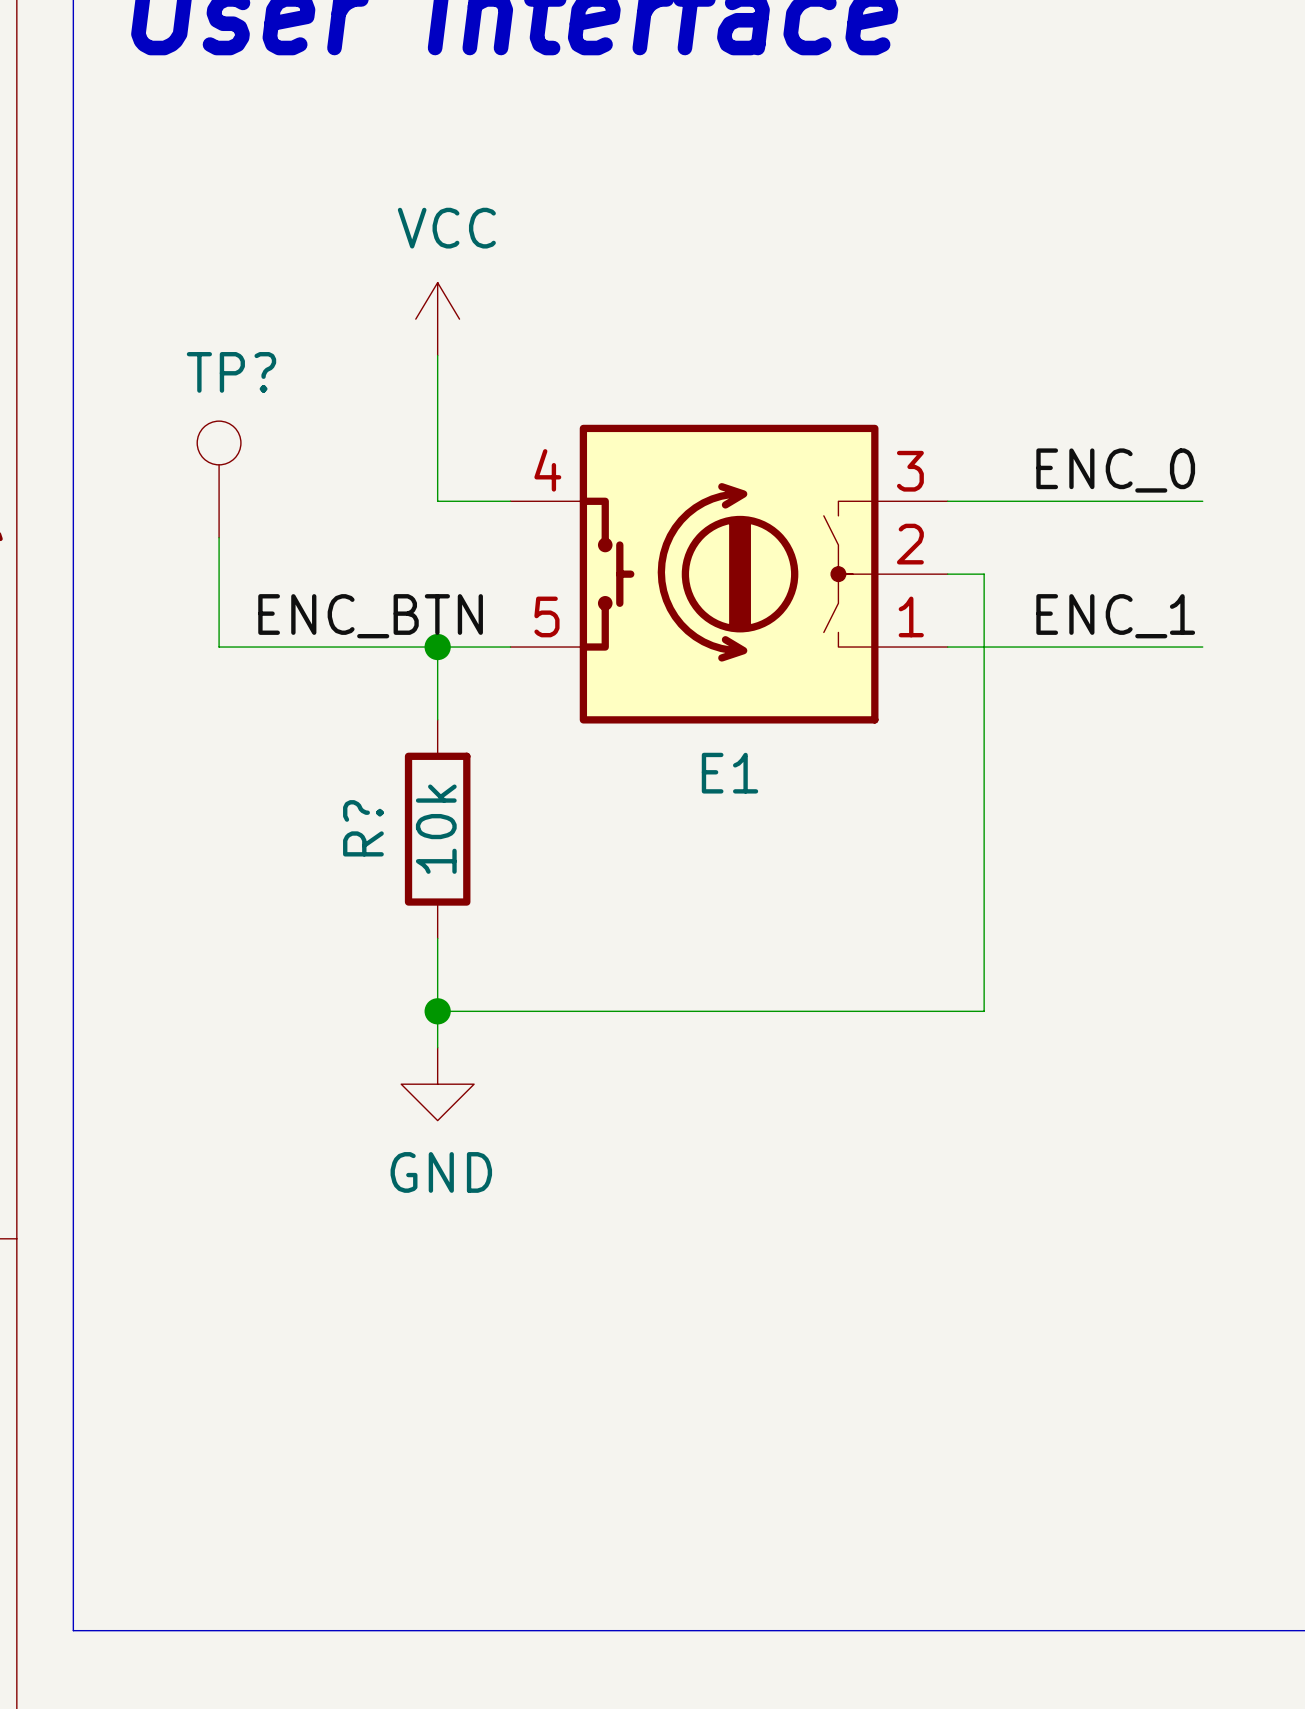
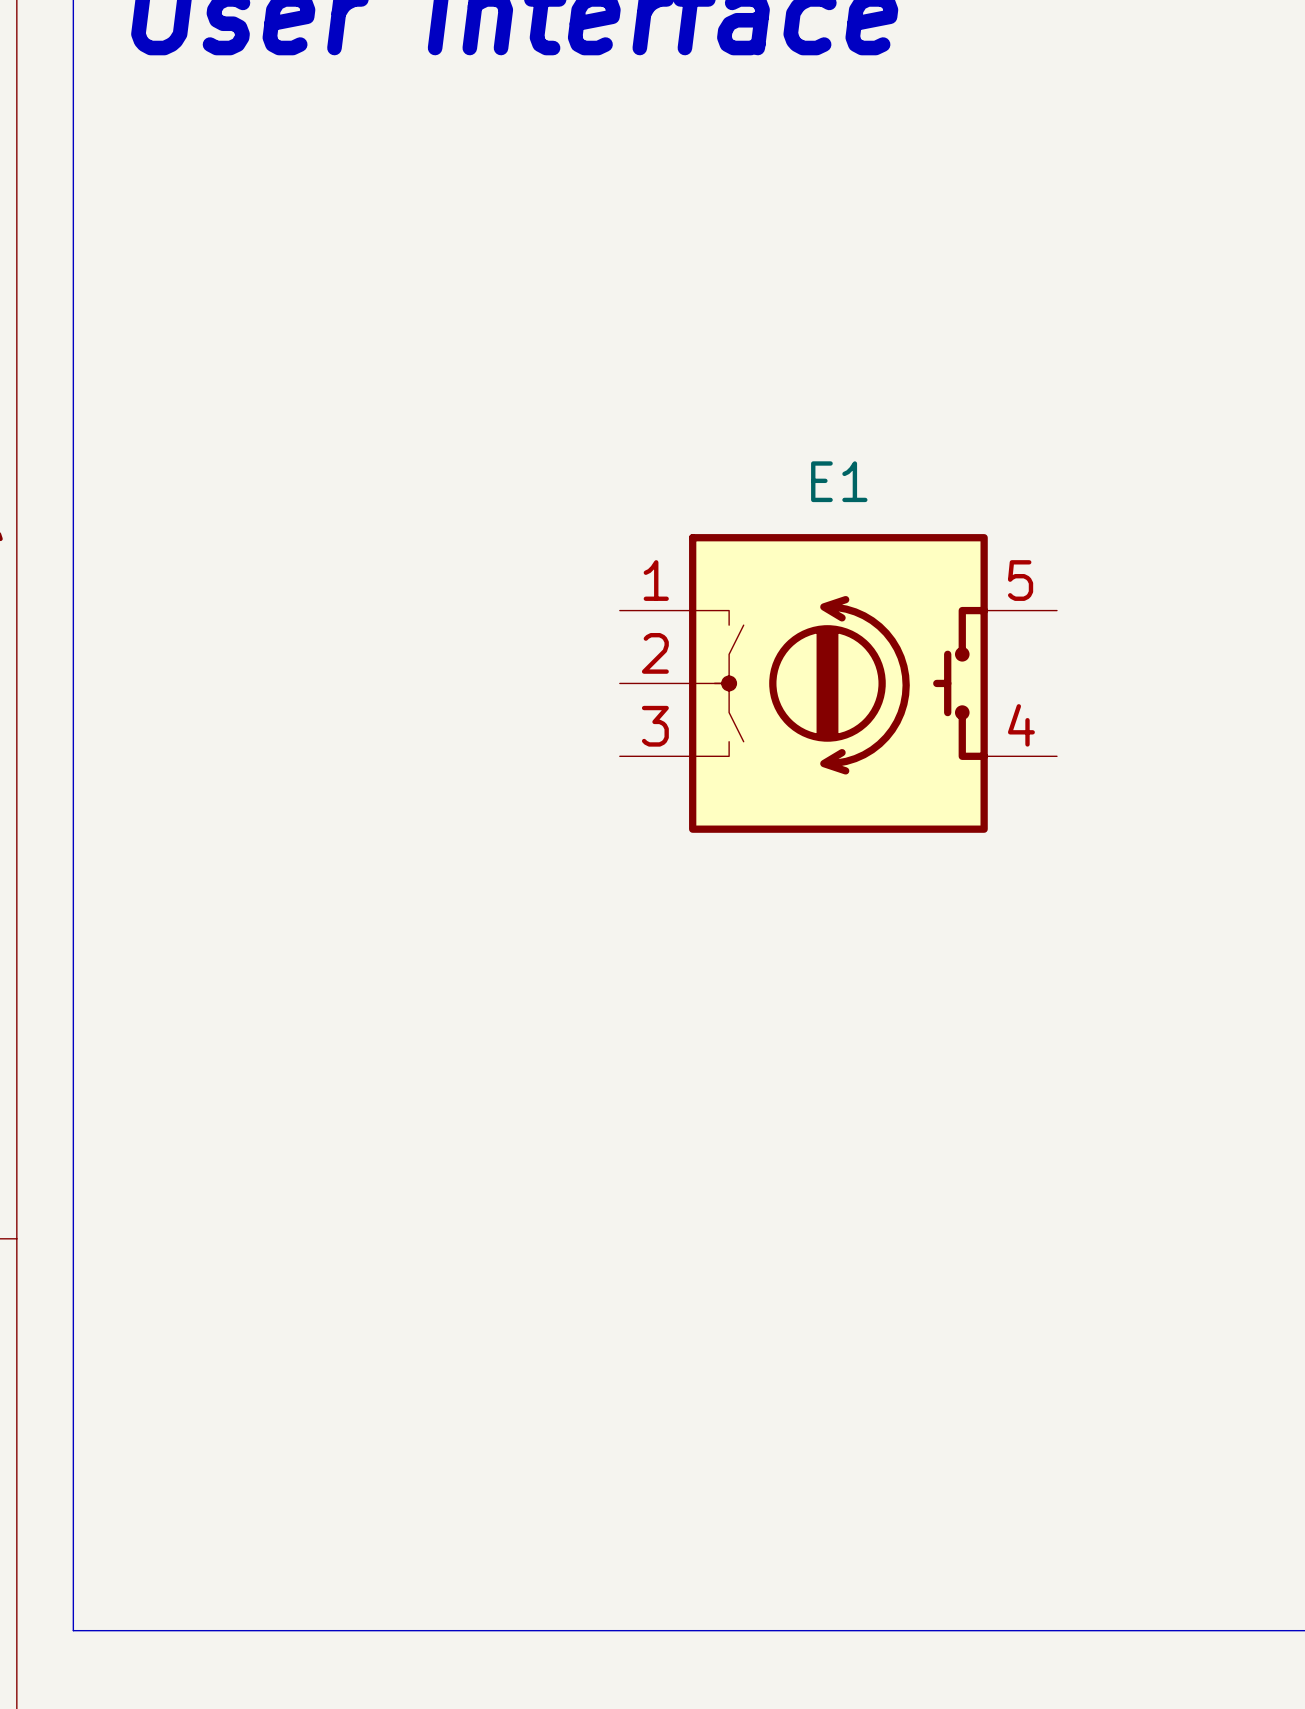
power symbol: VCC (437, 319) -> none
wire: (437, 355) (437, 501) (510, 501) -> none
label: ENC_0 (1115, 470) -> none
TP?: (219, 479) -> none
wire: (947, 501) (1202, 501) -> none
wire: (219, 537) (219, 647) (510, 647) -> none
E1 rotation: 0° (729, 574) -> 180° (838, 683)
wire: (947, 574) (984, 574) (984, 1011) (437, 1011) -> none
label: ENC_BTN (370, 616) -> none
label: ENC_1 (1115, 616) -> none
wire: (437, 647) (437, 719) -> none
junction: (437, 647) -> none
wire: (947, 647) (1202, 647) -> none
R?: (437, 829) -> none
wire: (437, 938) (437, 1047) -> none
junction: (437, 1011) -> none
power symbol: GND (437, 1084) -> none

